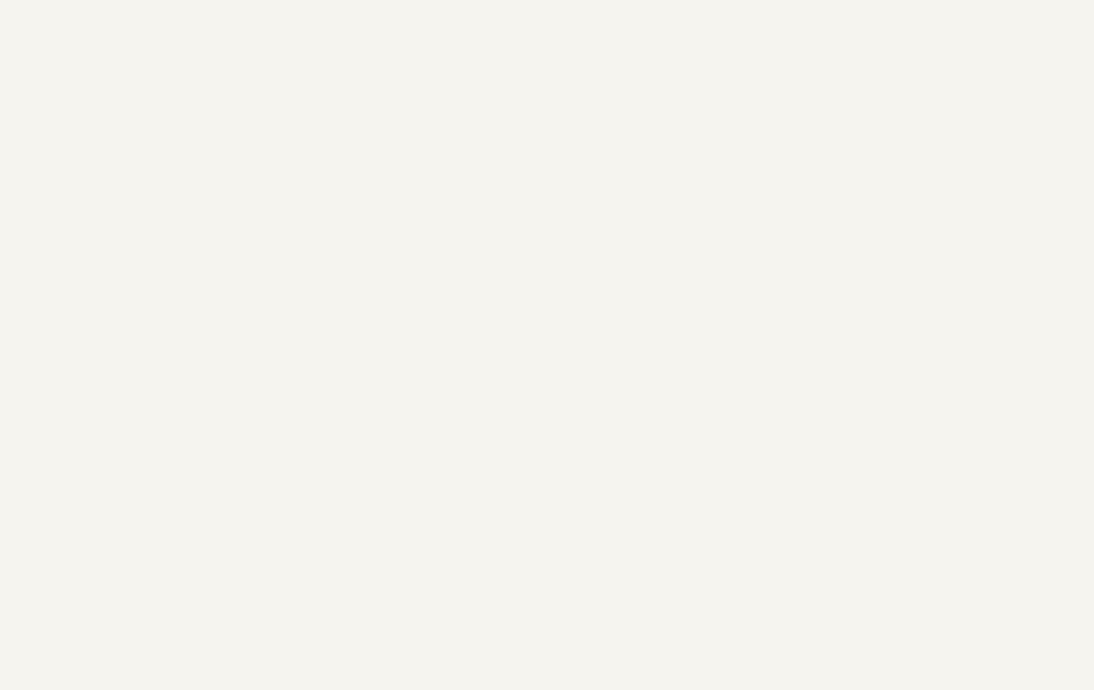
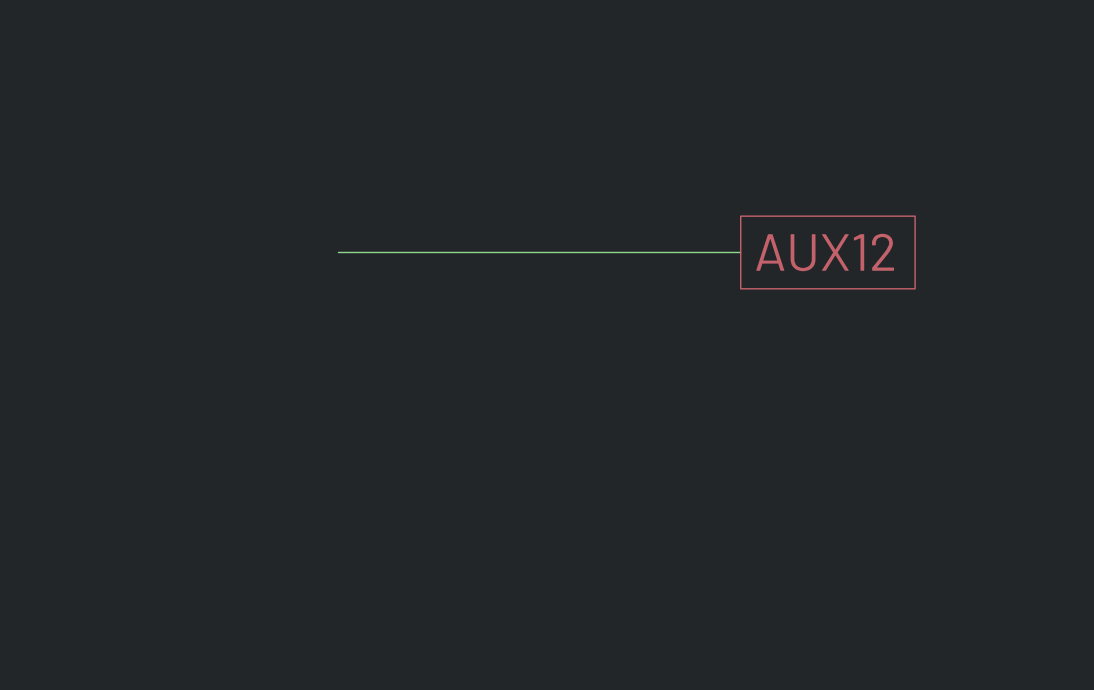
wire: none -> (338, 252) (740, 252)
global label: none -> AUX12 (825, 252)

